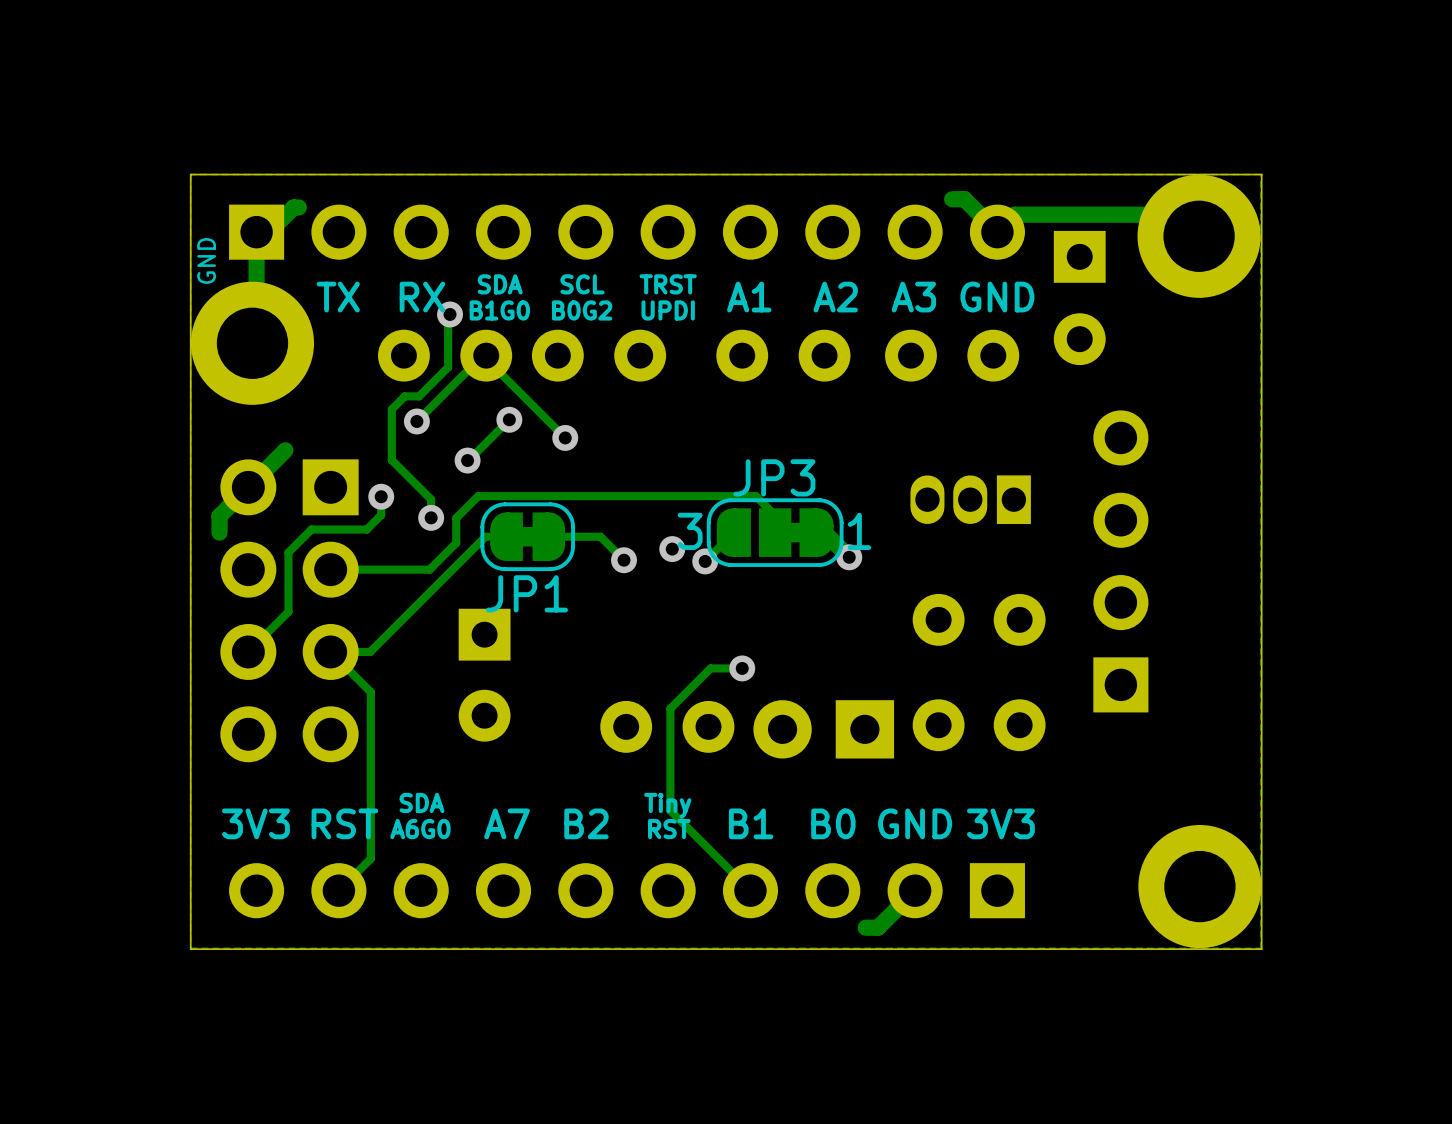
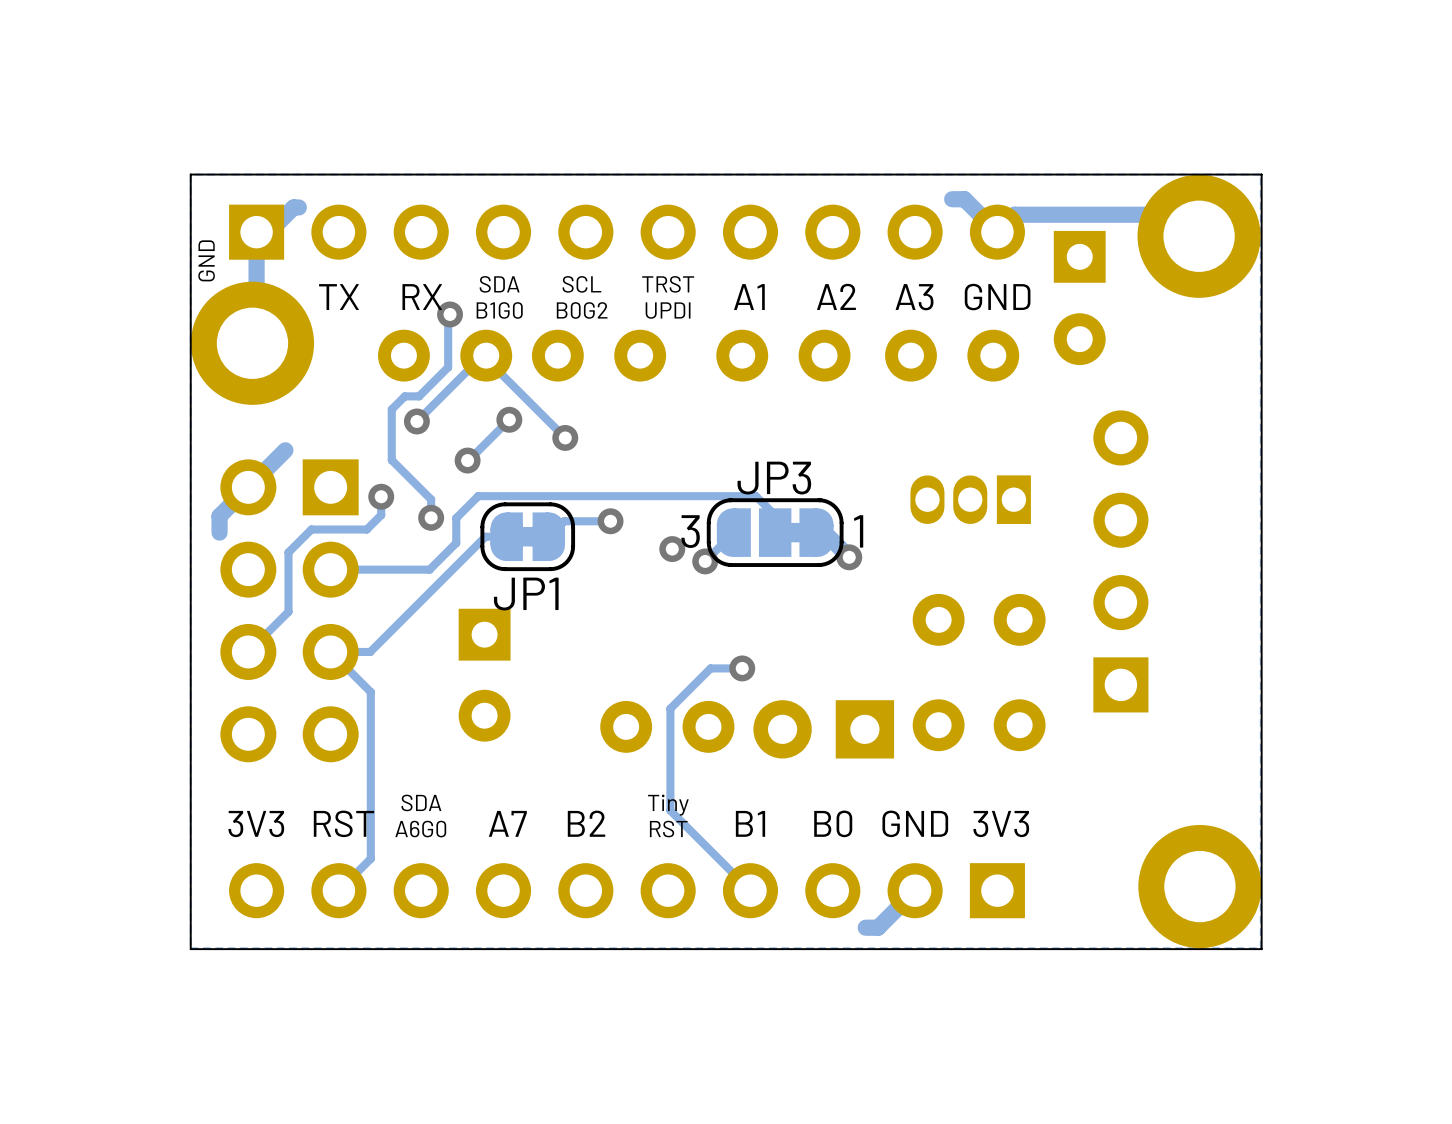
track: (548, 536) (600, 536) (624, 560) -> (548, 536) (564, 521) (610, 521)
via position: (624, 560) -> (610, 521)

